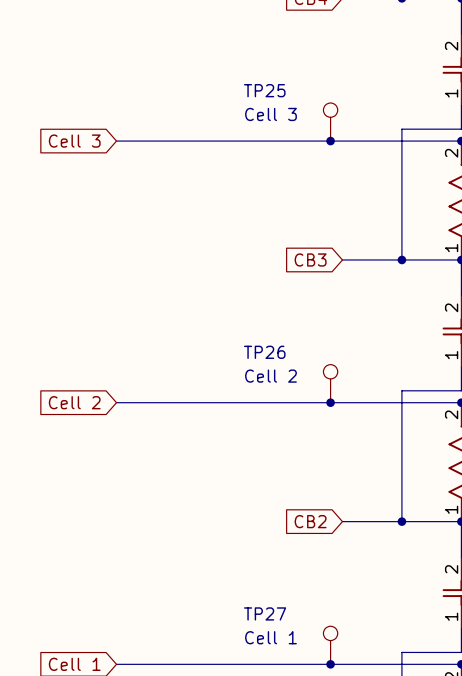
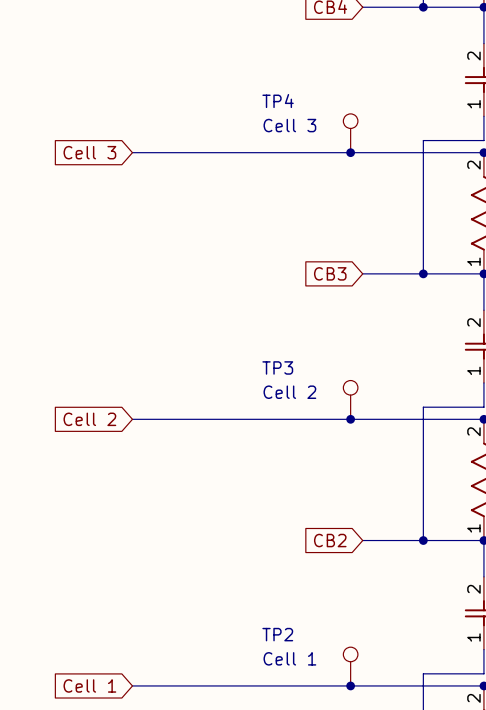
TP25 name: TP25 (264, 90) -> TP4 (278, 101)
TP26 name: TP26 (264, 352) -> TP3 (277, 367)
TP27 name: TP27 (265, 613) -> TP2 (277, 634)

